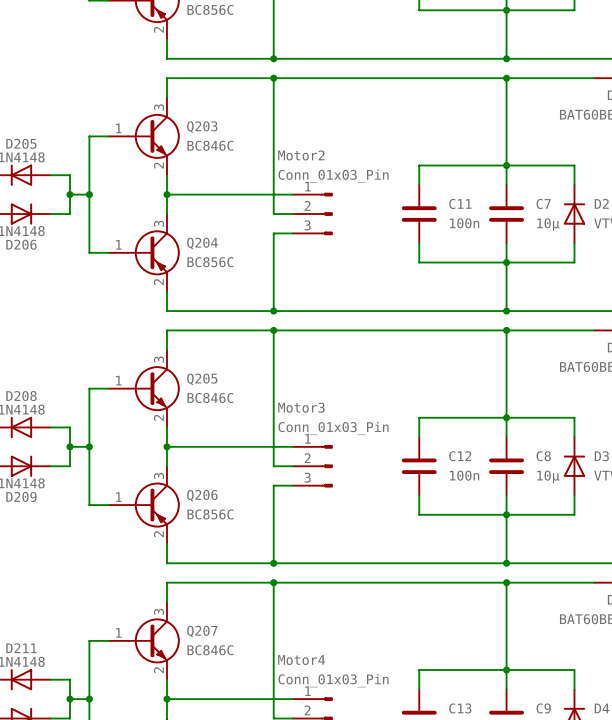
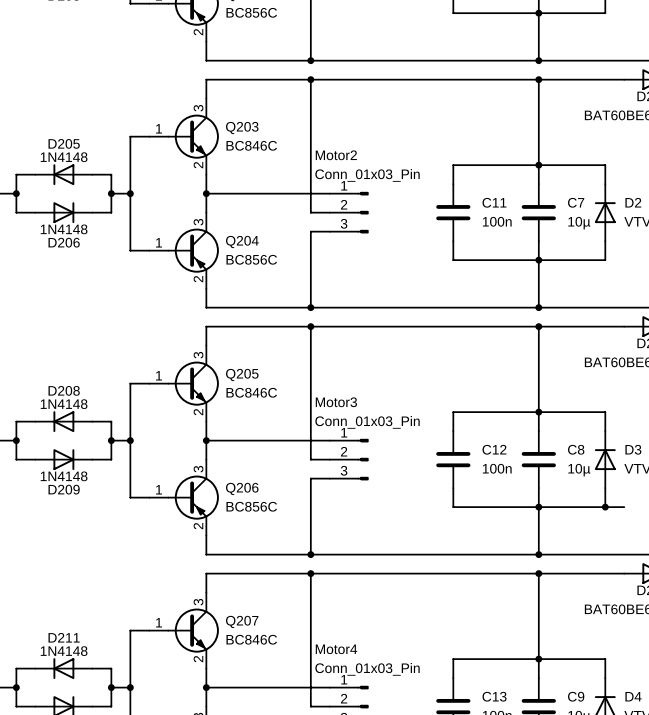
wire: none -> (605, 507) (624, 507)
junction: none -> (605, 507)

